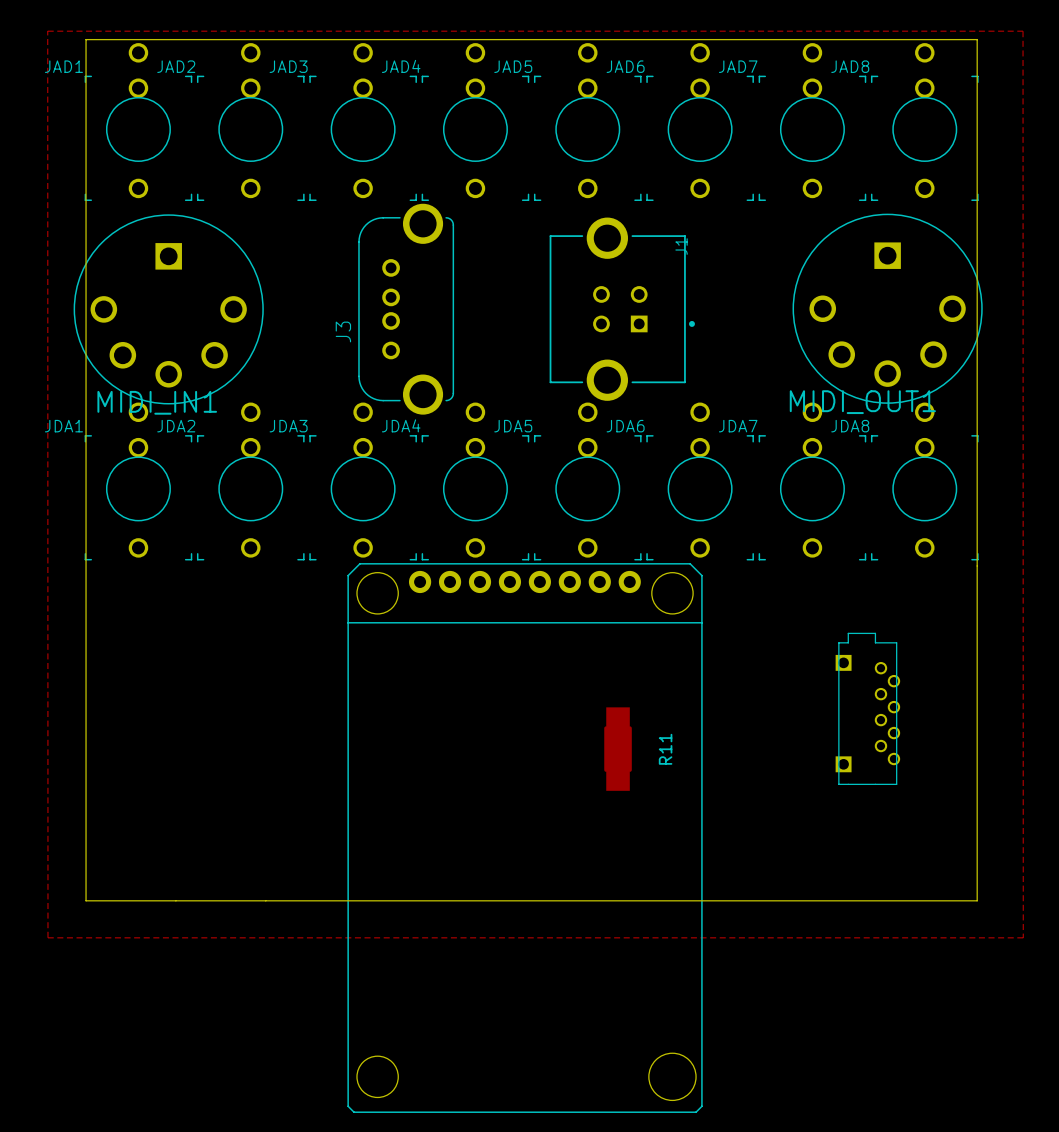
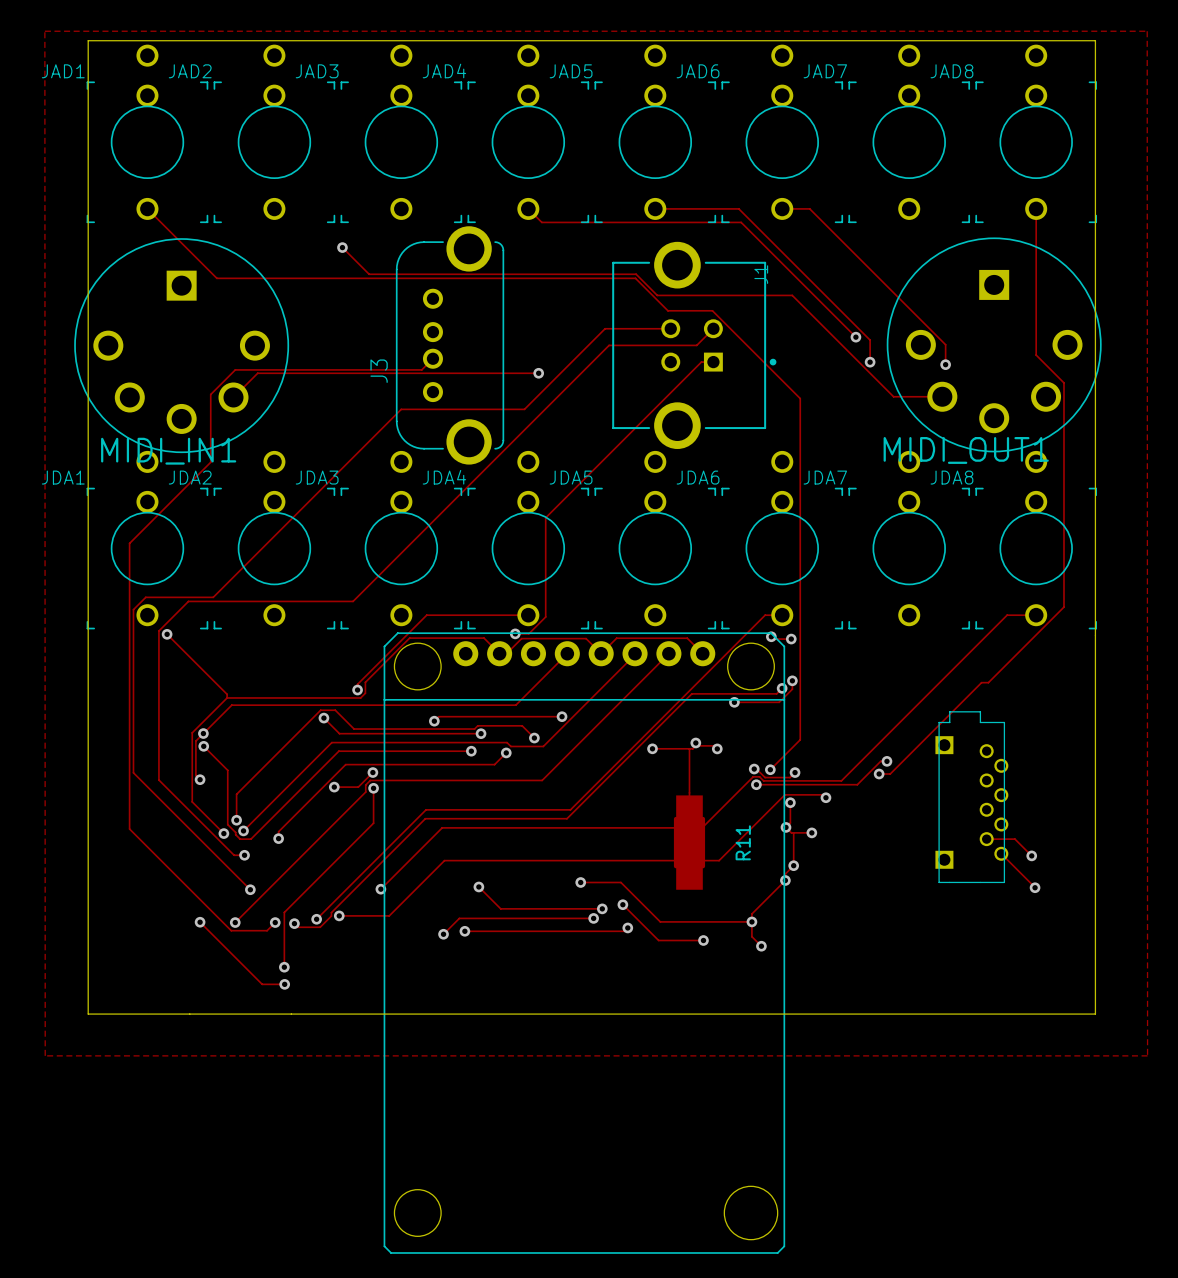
track: none -> (147, 208) (216, 278) (635, 278) (667, 310) (712, 310) (800, 398) (800, 739) (770, 769)
track: none -> (528, 208) (541, 222) (741, 222) (855, 337)
track: none -> (655, 208) (738, 208) (870, 340) (870, 362)
track: none -> (782, 208) (809, 208) (945, 344) (945, 364)
track: none -> (1036, 208) (1036, 355) (1063, 382) (1063, 607) (988, 682) (981, 682) (890, 774) (879, 774)
track: none -> (342, 247) (369, 274) (636, 274) (657, 295) (792, 295) (893, 396) (942, 396)
via: none -> (342, 247)
track: none -> (670, 328) (605, 328) (524, 409) (401, 409) (213, 597) (145, 597) (133, 609) (133, 772) (250, 889)
track: none -> (713, 328) (696, 345) (609, 345) (353, 601) (188, 601) (158, 630) (158, 780) (234, 855) (244, 855)
via: none -> (855, 337)
track: none -> (432, 358) (421, 369) (235, 369) (210, 394) (210, 462) (129, 543) (129, 829) (231, 930) (267, 930) (275, 922)
track: none -> (713, 362) (701, 362) (545, 517) (545, 616) (528, 633) (515, 633)
via: none -> (870, 362)
via: none -> (945, 364)
track: none -> (538, 373) (257, 373) (233, 397)
via: none -> (538, 373)
track: none -> (528, 615) (426, 615) (357, 684) (357, 690)
track: none -> (782, 615) (765, 615) (570, 809) (426, 809) (316, 919)
track: none -> (1036, 615) (1007, 615) (841, 780) (763, 780) (759, 776) (753, 776) (702, 827) (442, 827) (380, 889)
track: none -> (167, 634) (227, 694) (227, 697)
via: none -> (167, 634)
via: none -> (515, 633)
track: none -> (771, 636) (773, 639) (791, 639)
via: none -> (771, 636)
via: none -> (791, 639)
track: none -> (567, 653) (515, 705) (231, 705) (195, 741) (195, 775) (200, 779)
track: none -> (635, 653) (543, 746) (510, 746) (507, 742) (331, 742) (243, 830)
track: none -> (668, 653) (542, 780) (370, 780) (365, 785) (365, 792) (235, 922)
track: none -> (702, 653) (687, 638) (616, 638) (601, 653) (586, 638) (521, 638) (506, 653) (499, 653) (484, 638) (409, 638) (365, 682) (365, 693) (360, 697) (227, 697)
track: none -> (792, 680) (792, 689) (779, 702) (734, 702)
via: none -> (792, 680)
track: none -> (782, 688) (776, 693) (691, 693) (567, 818) (425, 818) (331, 912) (331, 916) (320, 927) (298, 927) (294, 923)
via: none -> (782, 688)
via: none -> (357, 690)
track: none -> (227, 697) (192, 732) (192, 801) (223, 833)
via: none -> (734, 702)
track: none -> (562, 716) (438, 716) (434, 721)
via: none -> (562, 716)
track: none -> (323, 718) (339, 733) (481, 733)
via: none -> (323, 718)
via: none -> (434, 721)
via: none -> (203, 733)
via: none -> (481, 733)
track: none -> (534, 738) (522, 725) (477, 725) (474, 729) (354, 729) (335, 710) (320, 710) (236, 794) (236, 820)
via: none -> (534, 738)
via: none -> (695, 742)
track: none -> (203, 746) (227, 770) (227, 824) (240, 839) (250, 839) (338, 751) (471, 751)
via: none -> (203, 746)
track: none -> (695, 745) (714, 745) (717, 748)
track: none -> (695, 745) (692, 748) (652, 748)
via: none -> (652, 748)
track: none -> (689, 748) (689, 808)
via: none -> (717, 748)
via: none -> (471, 751)
track: none -> (506, 752) (494, 764) (345, 764) (278, 831) (278, 838)
via: none -> (506, 752)
track: none -> (886, 761) (880, 761) (857, 784) (756, 784)
via: none -> (886, 761)
track: none -> (754, 769) (765, 777) (790, 777) (795, 772)
via: none -> (754, 769)
via: none -> (770, 769)
track: none -> (372, 772) (358, 787) (334, 787)
via: none -> (372, 772)
via: none -> (795, 772)
via: none -> (879, 774)
via: none -> (200, 779)
via: none -> (756, 784)
via: none -> (334, 787)
track: none -> (373, 788) (373, 823) (284, 912) (284, 967)
via: none -> (373, 788)
track: none -> (825, 797) (823, 794) (784, 794) (719, 860) (444, 860) (389, 915) (339, 915)
via: none -> (825, 797)
track: none -> (790, 802) (790, 823) (785, 827) (791, 832) (811, 832)
via: none -> (790, 802)
via: none -> (236, 820)
via: none -> (785, 827)
via: none -> (243, 830)
track: none -> (793, 832) (793, 865) (785, 873) (785, 880) (751, 913) (751, 936) (761, 946)
via: none -> (811, 832)
via: none -> (223, 833)
via: none -> (278, 838)
track: none -> (986, 839) (1014, 839) (1031, 855)
track: none -> (1001, 853) (1035, 887)
via: none -> (244, 855)
via: none -> (1031, 855)
via: none -> (793, 865)
via: none -> (785, 880)
track: none -> (580, 882) (620, 882) (660, 921) (751, 921)
via: none -> (580, 882)
track: none -> (478, 886) (500, 908) (602, 908)
via: none -> (478, 886)
via: none -> (1035, 887)
via: none -> (250, 889)
via: none -> (380, 889)
track: none -> (622, 904) (658, 940) (703, 940)
via: none -> (622, 904)
via: none -> (602, 908)
via: none -> (339, 915)
via: none -> (316, 919)
track: none -> (593, 918) (459, 918) (443, 934)
via: none -> (593, 918)
track: none -> (200, 922) (262, 984) (284, 984)
via: none -> (200, 922)
via: none -> (235, 922)
via: none -> (275, 922)
via: none -> (751, 921)
via: none -> (294, 923)
track: none -> (627, 927) (624, 931) (464, 931)
via: none -> (627, 927)
via: none -> (464, 931)
via: none -> (443, 934)
via: none -> (703, 940)
via: none -> (761, 946)
via: none -> (284, 967)
via: none -> (284, 984)

